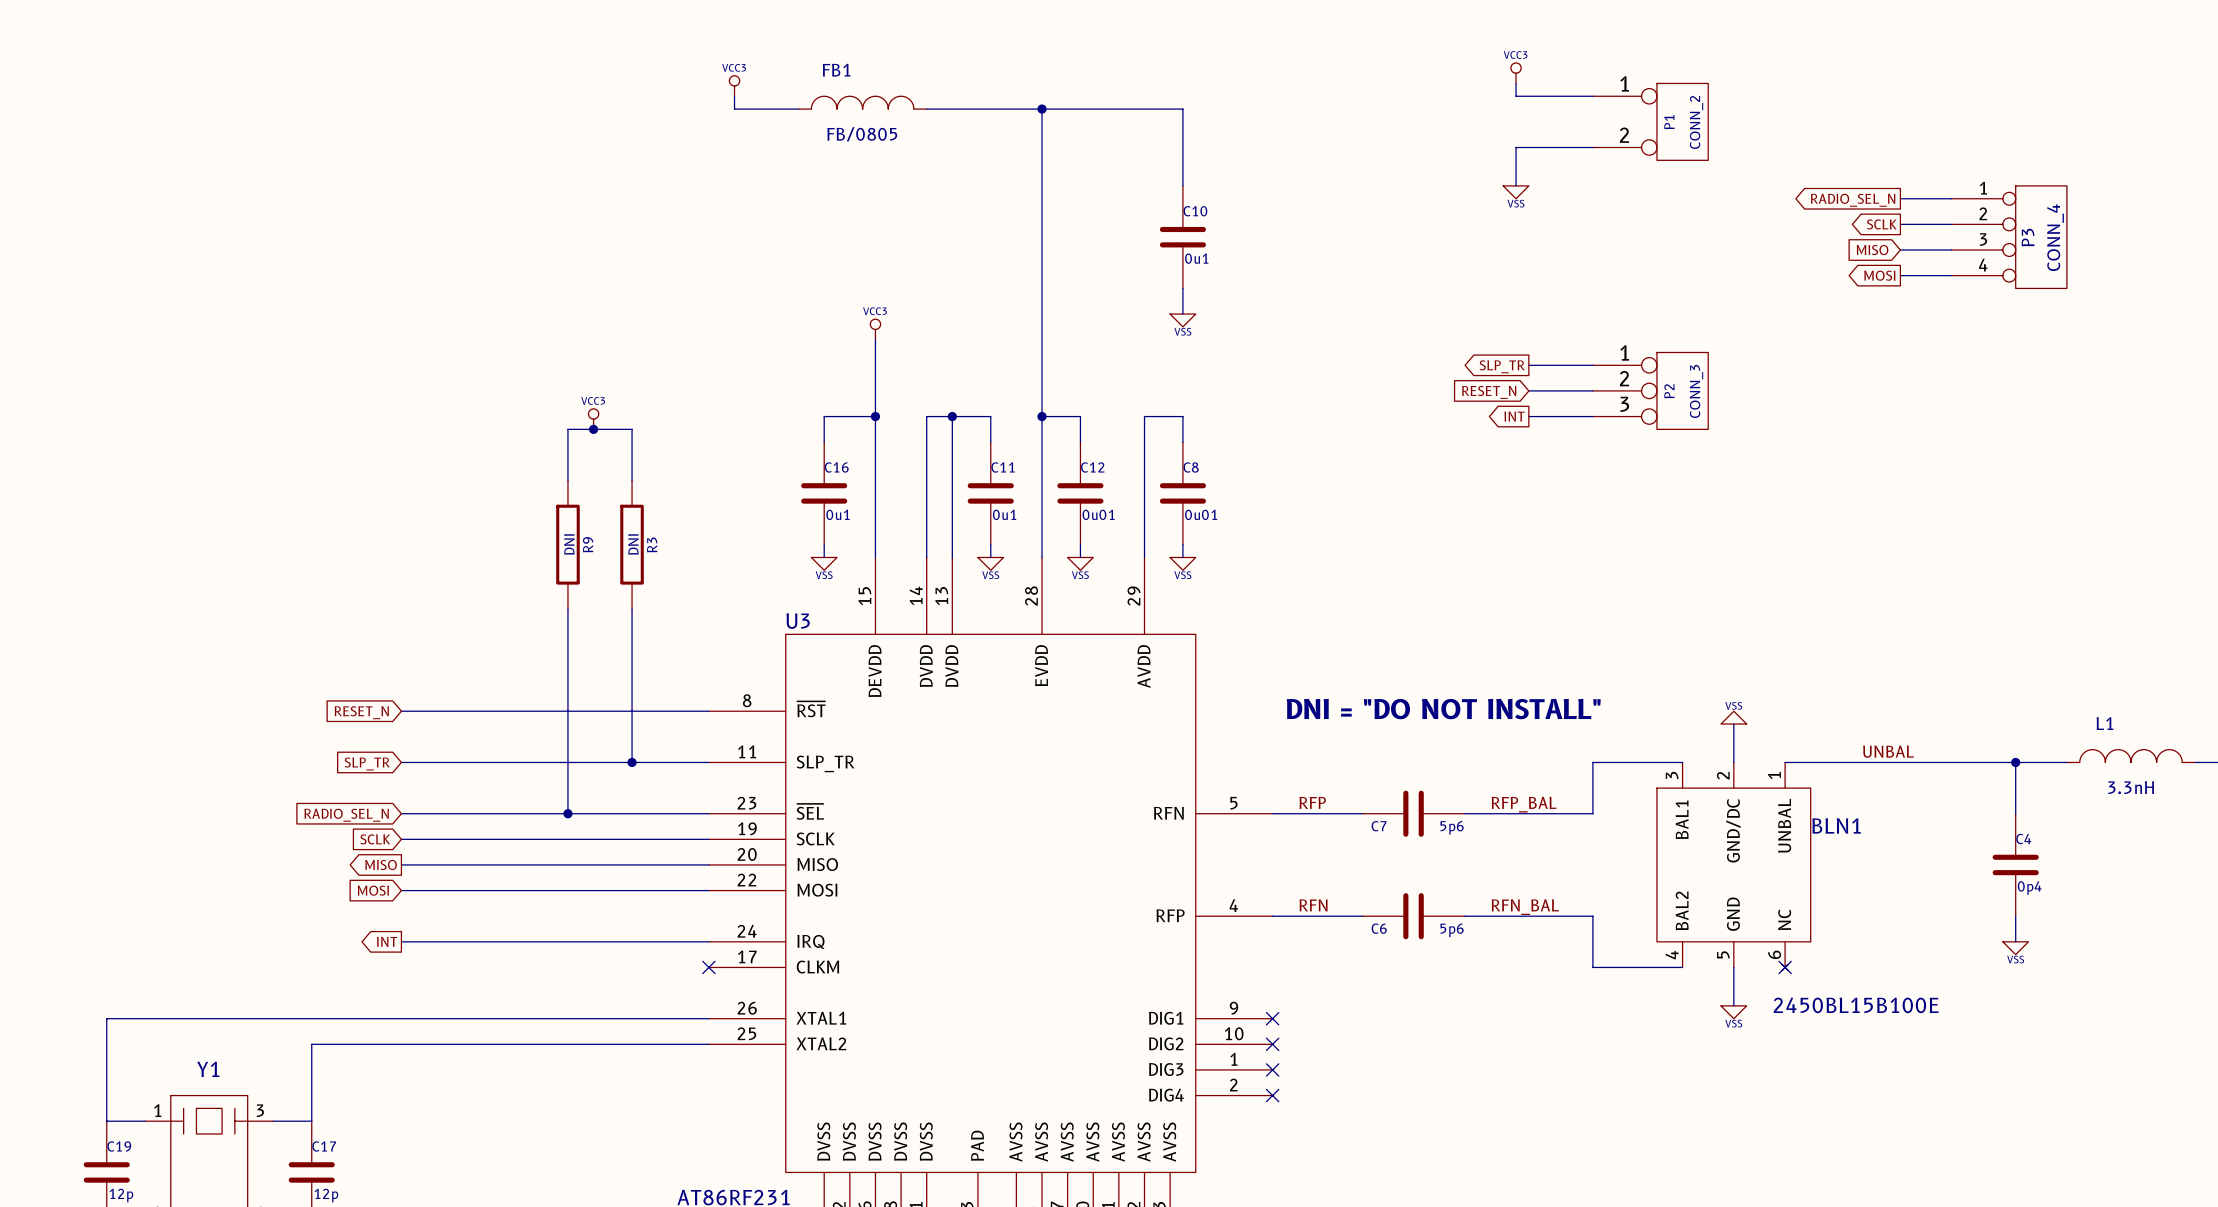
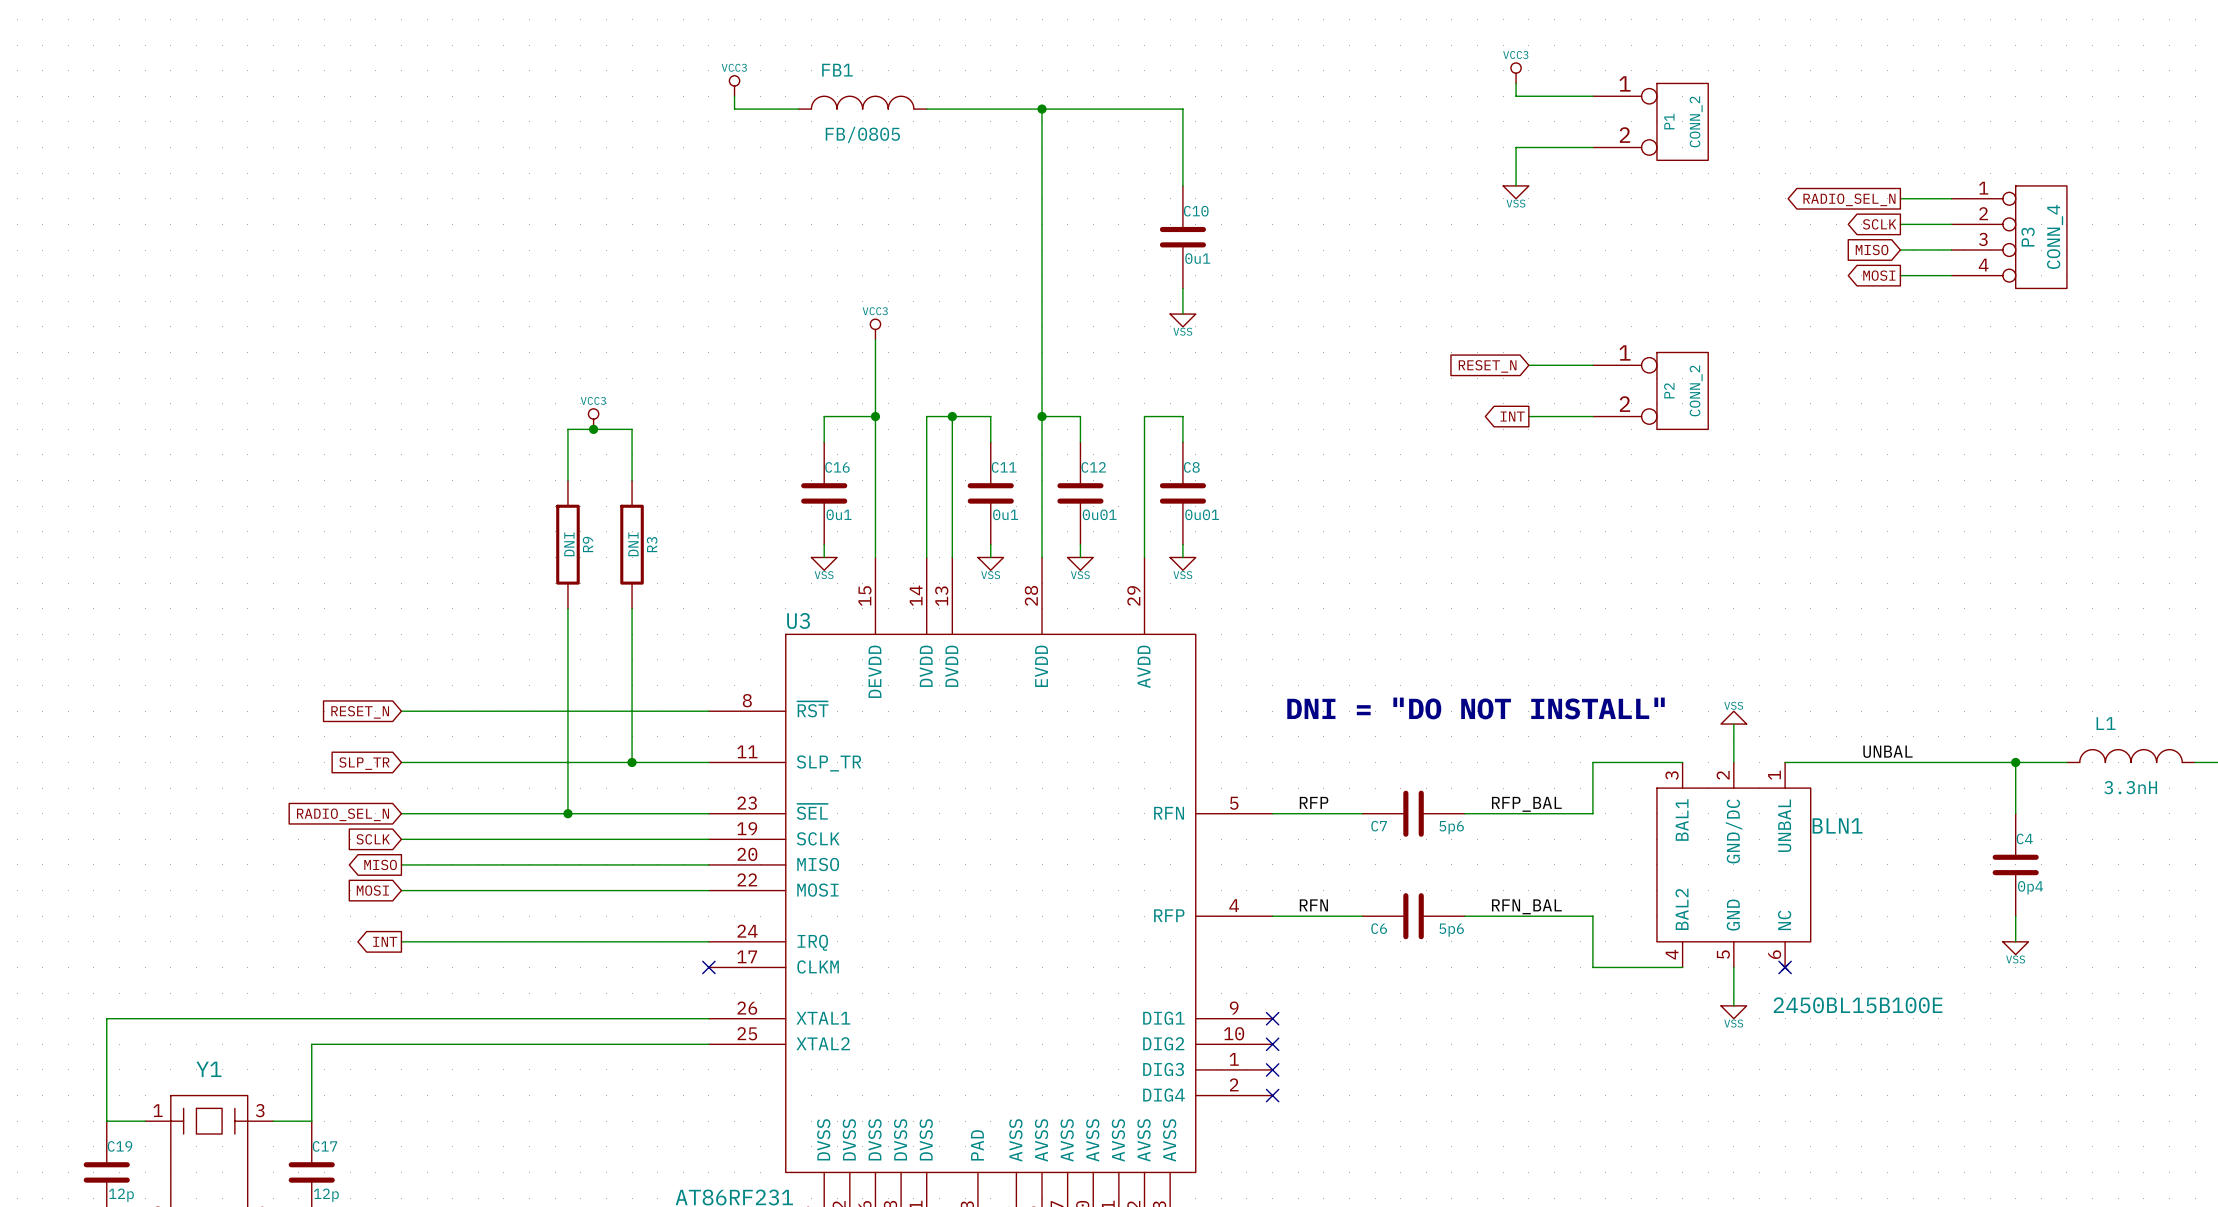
P2 symbol: [1592, 352, 1709, 430] -> [1592, 352, 1709, 430]
global label shape: output (1502, 366) -> input (1487, 366)
global label: SLP_TR (1502, 366) -> RESET_N (1487, 366)
wire: (1528, 390) (1592, 390) -> none
P2 value: CONN_3 (1696, 391) -> CONN_2 (1696, 390)
global label: RESET_N (1489, 392) -> none

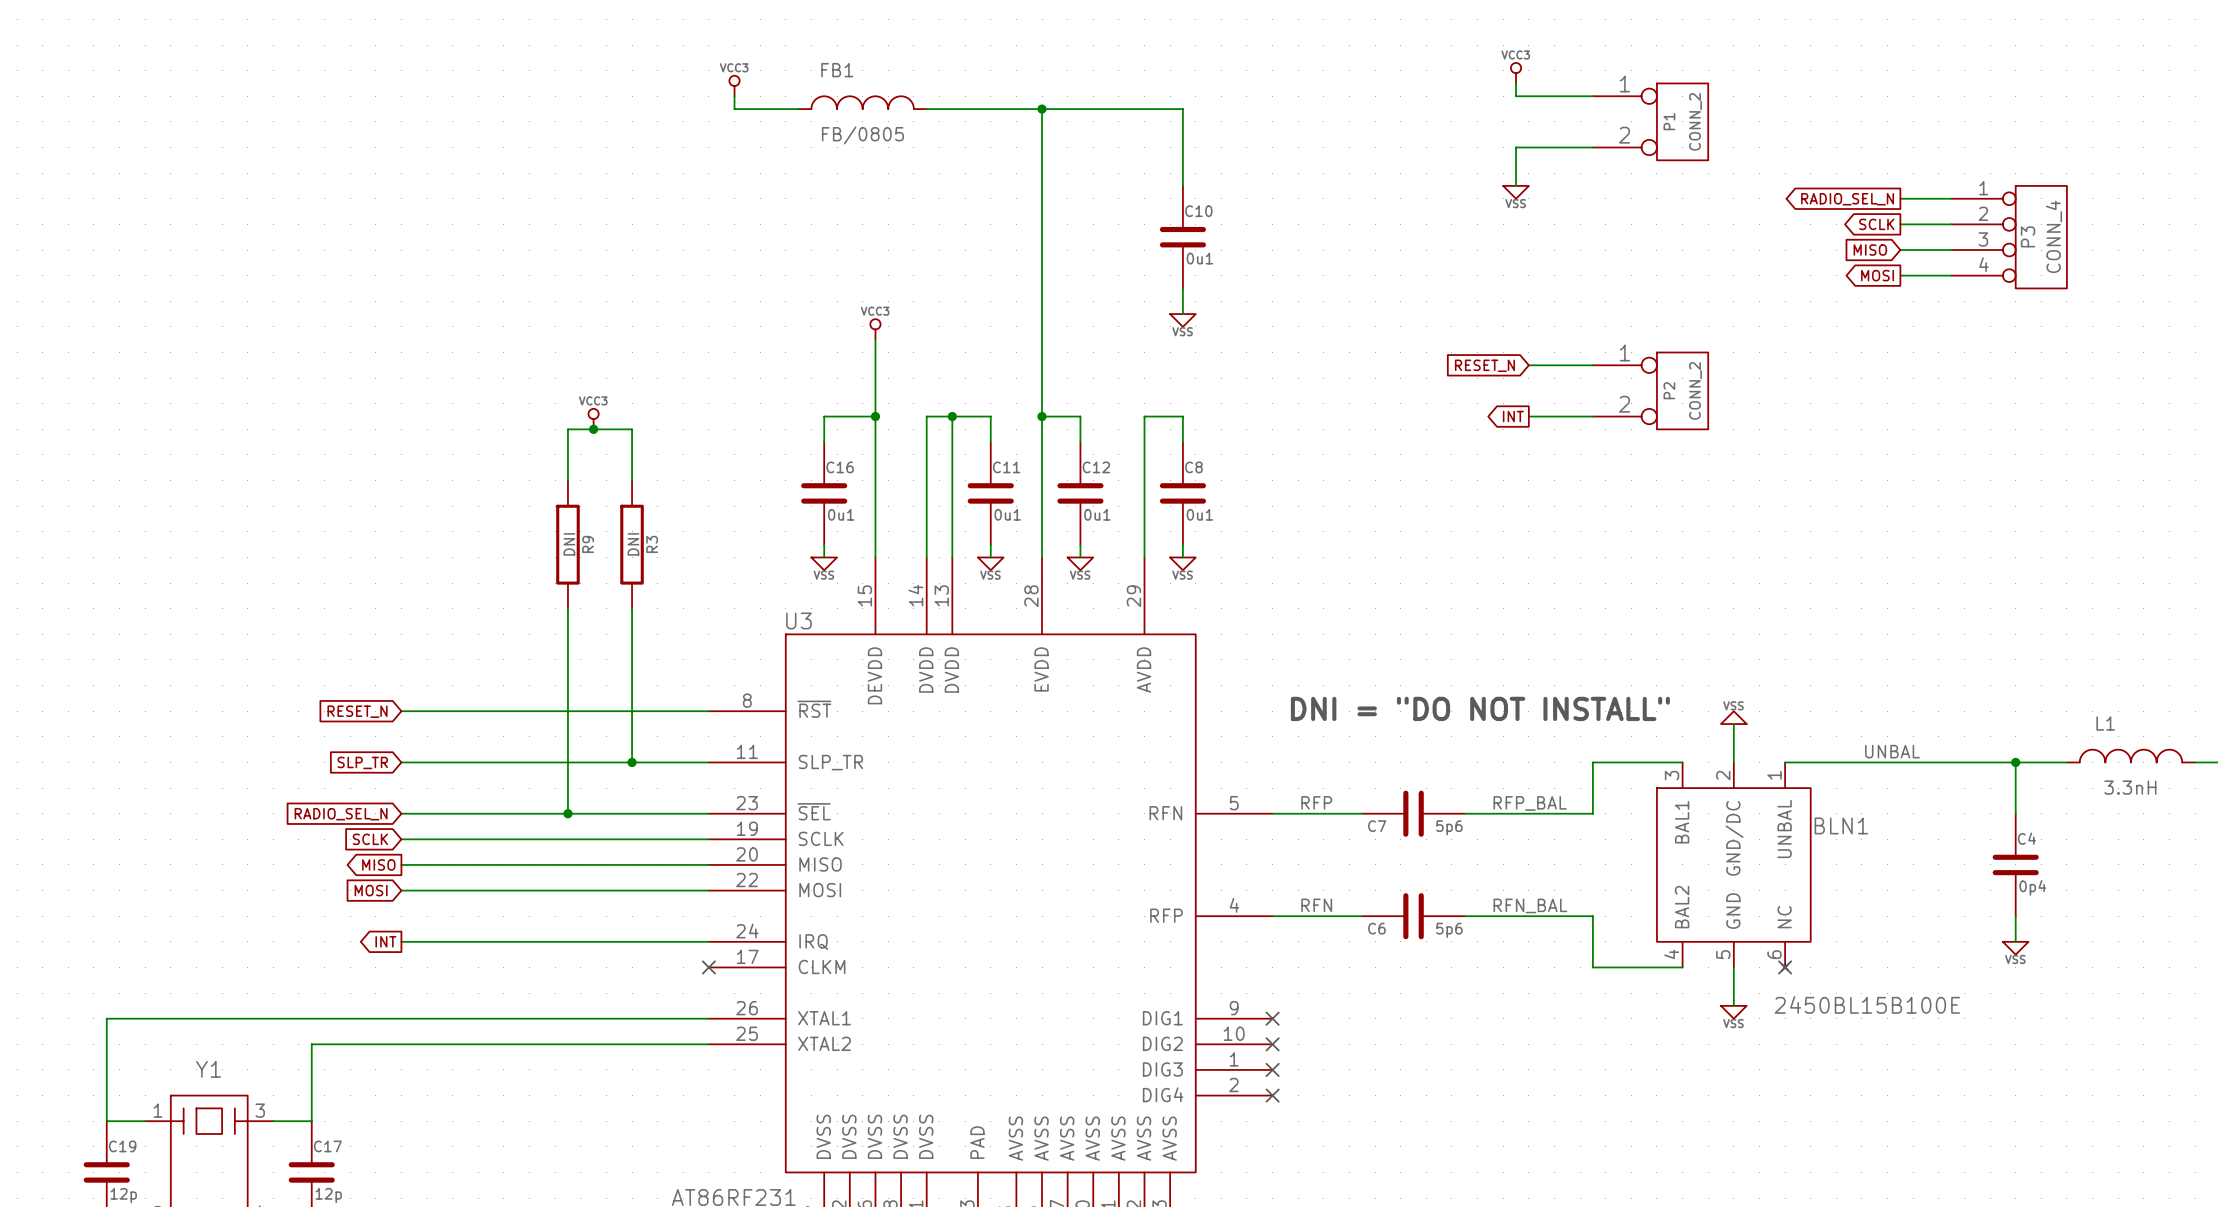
C12 value: 0u01 (1099, 514) -> 0u1 (1097, 514)
C8 value: 0u01 (1202, 514) -> 0u1 (1199, 514)

